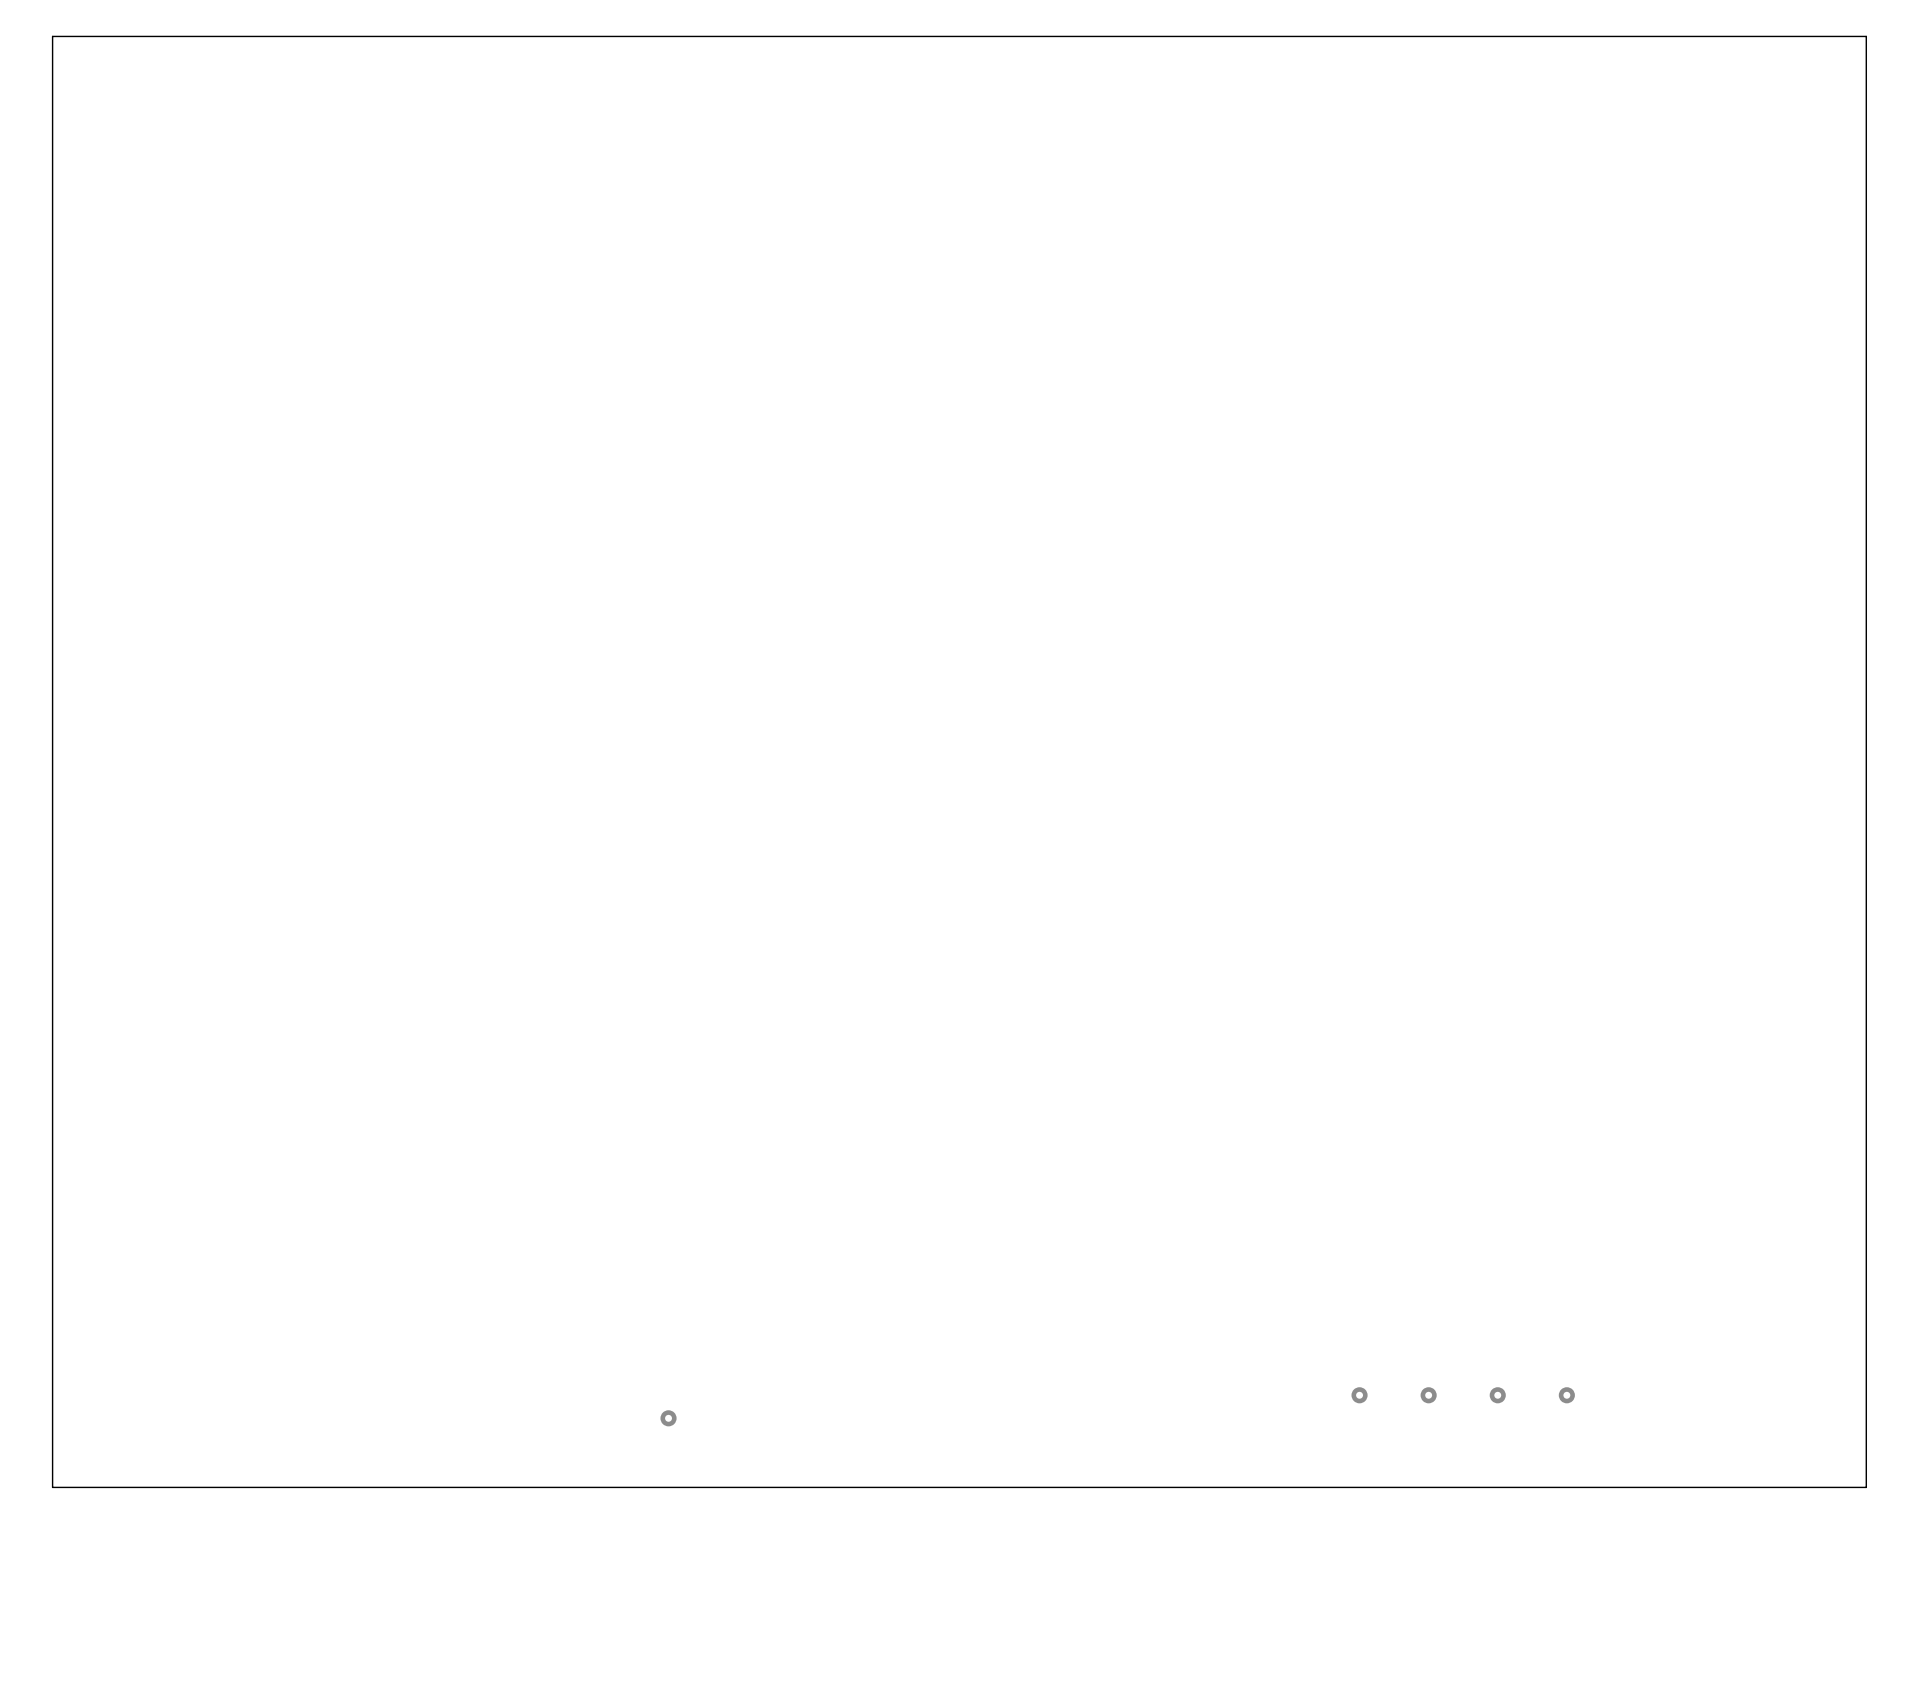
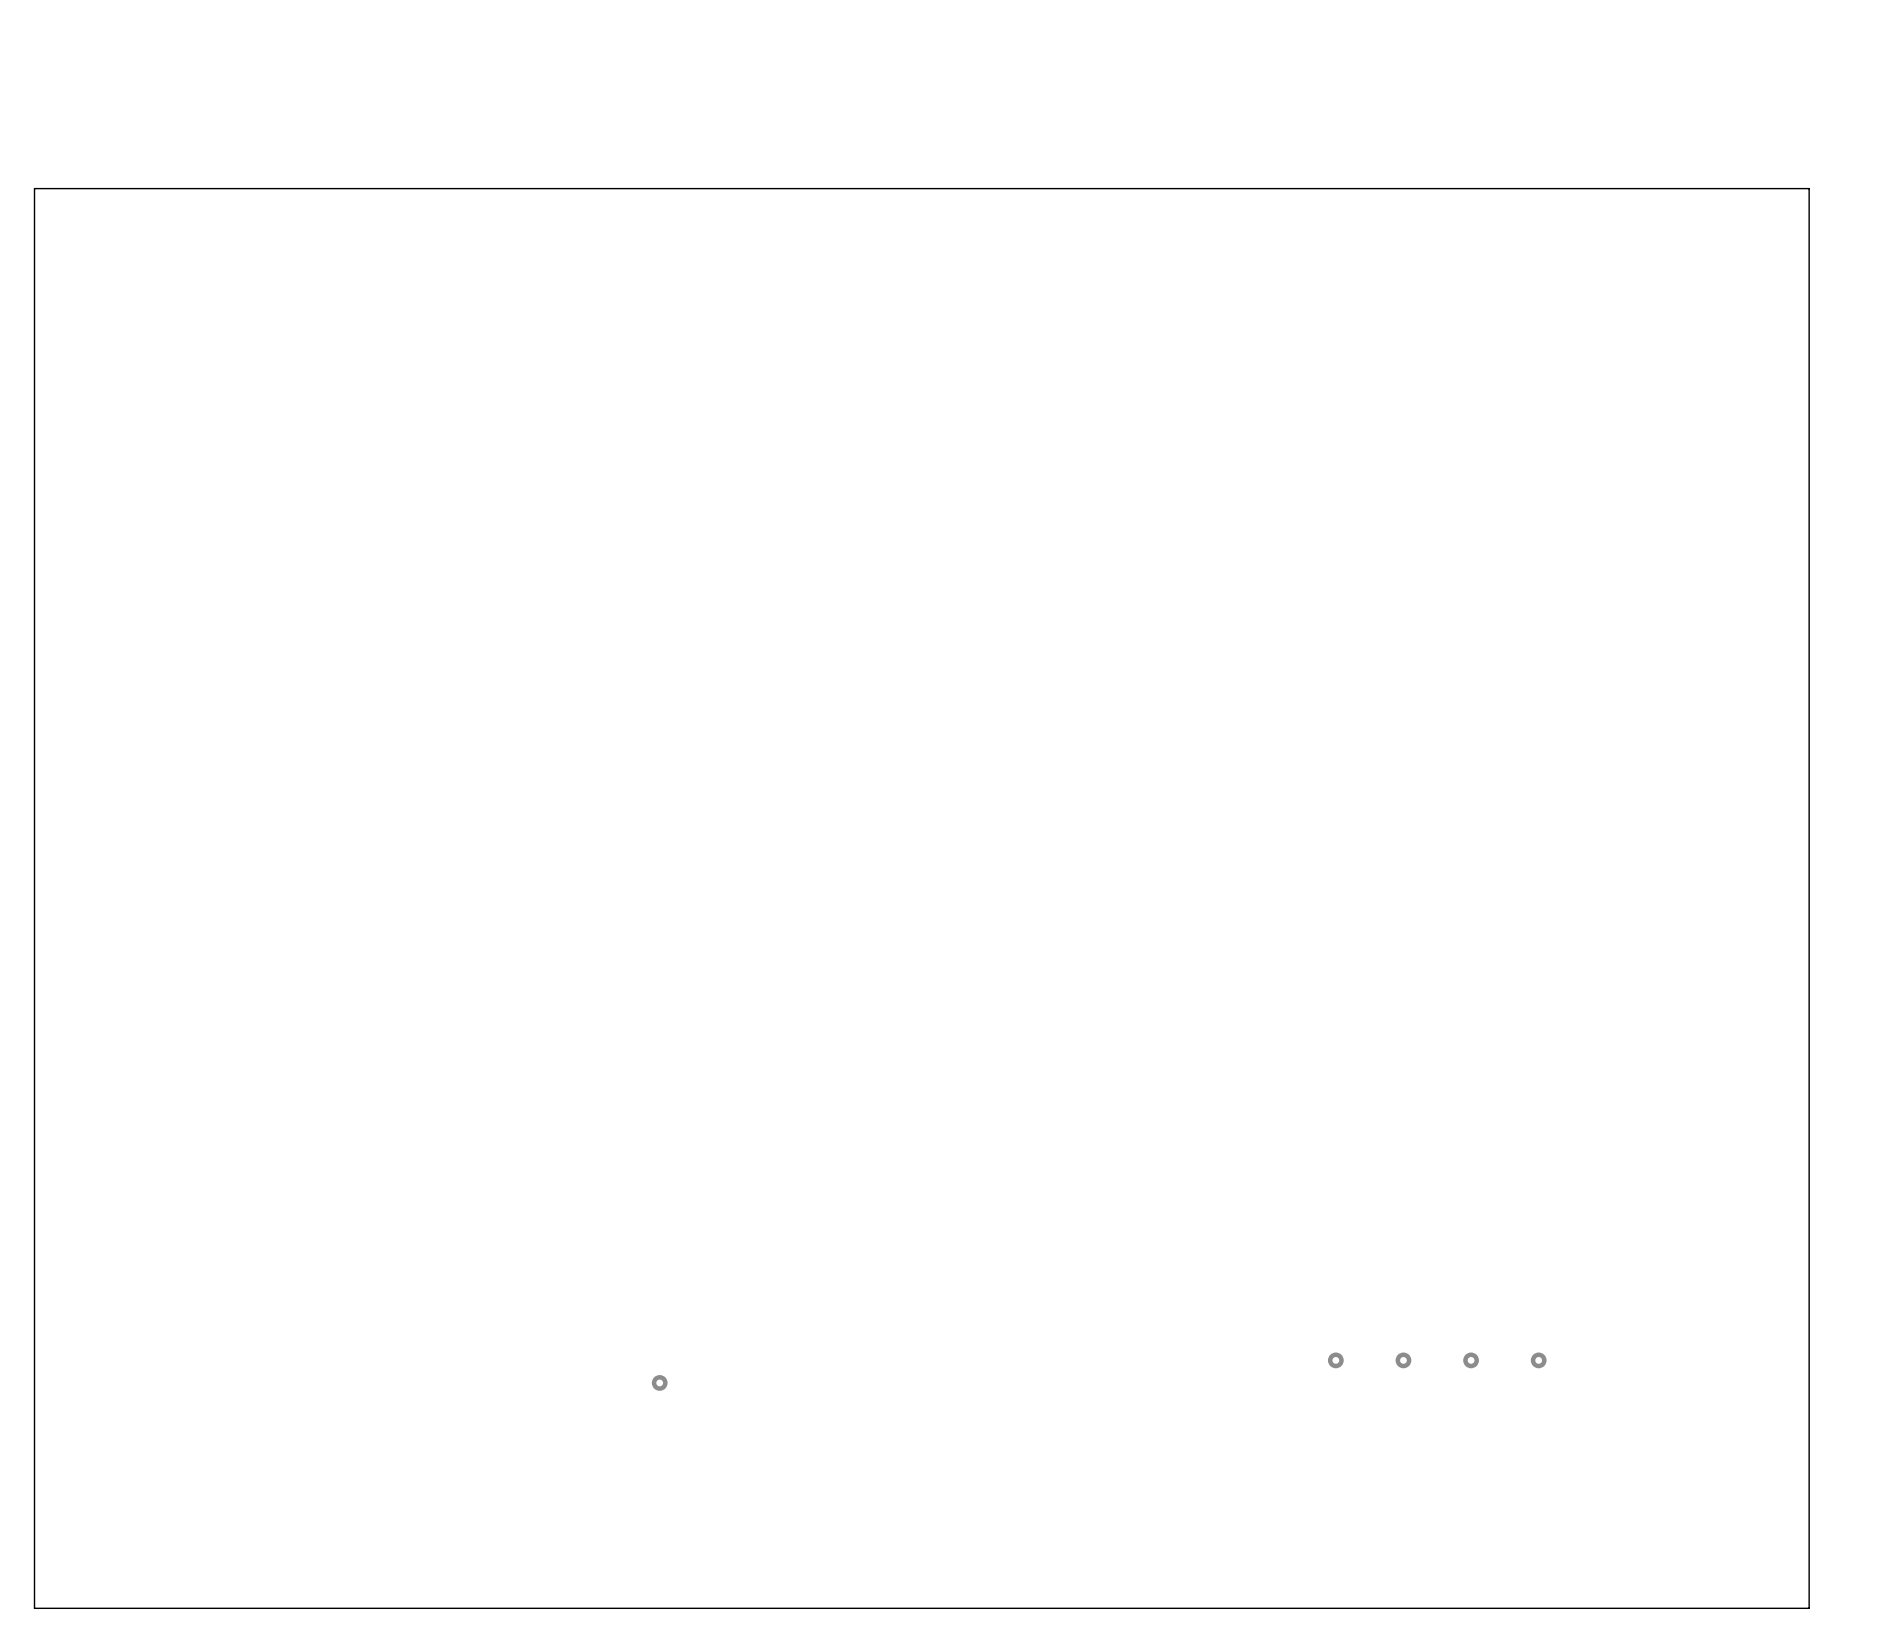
board edge: (1866, 36) (52, 36) (52, 1487) (1866, 1487) (1866, 36) -> (1809, 188) (34, 188) (34, 1608) (1809, 1608) (1809, 188)

